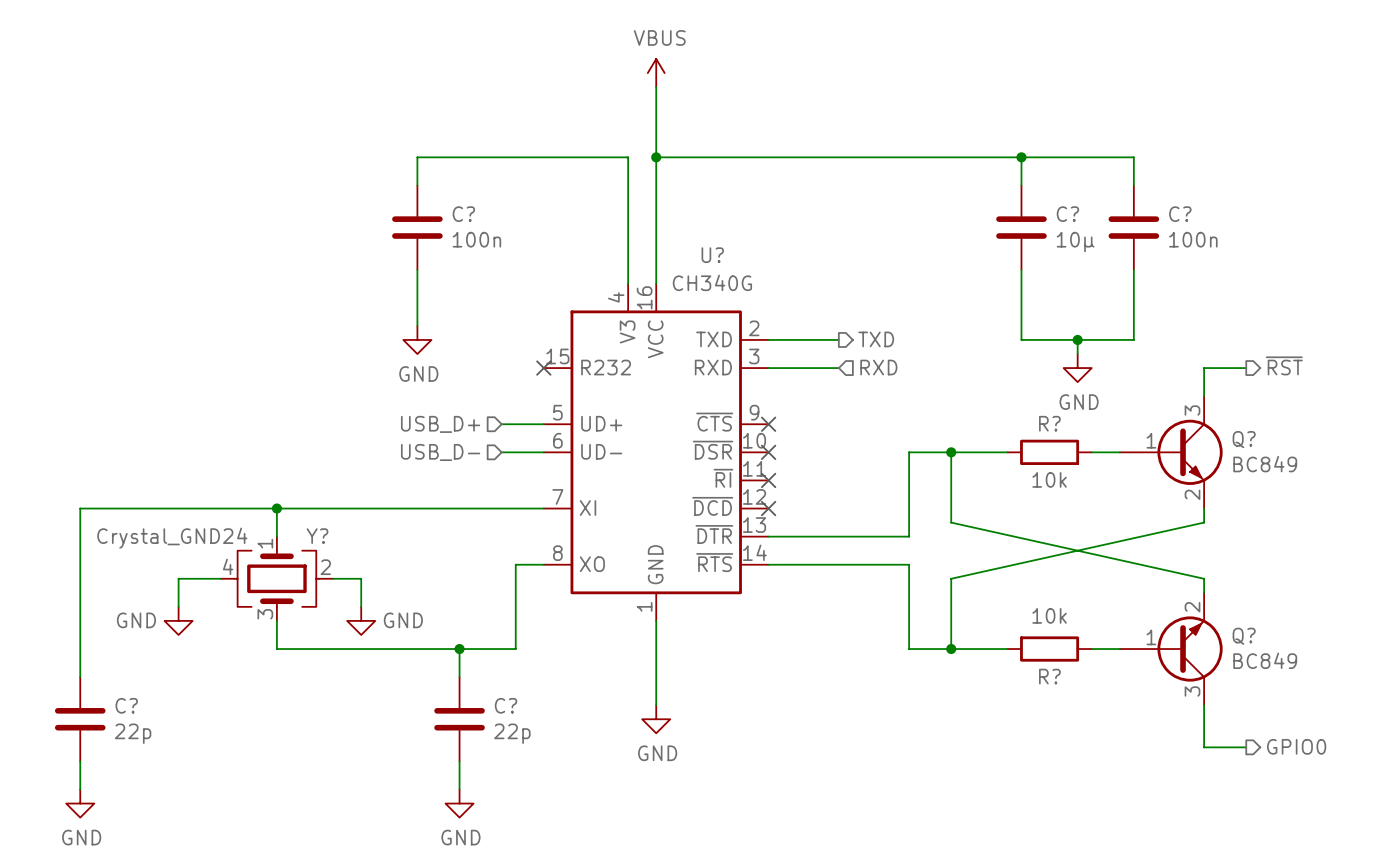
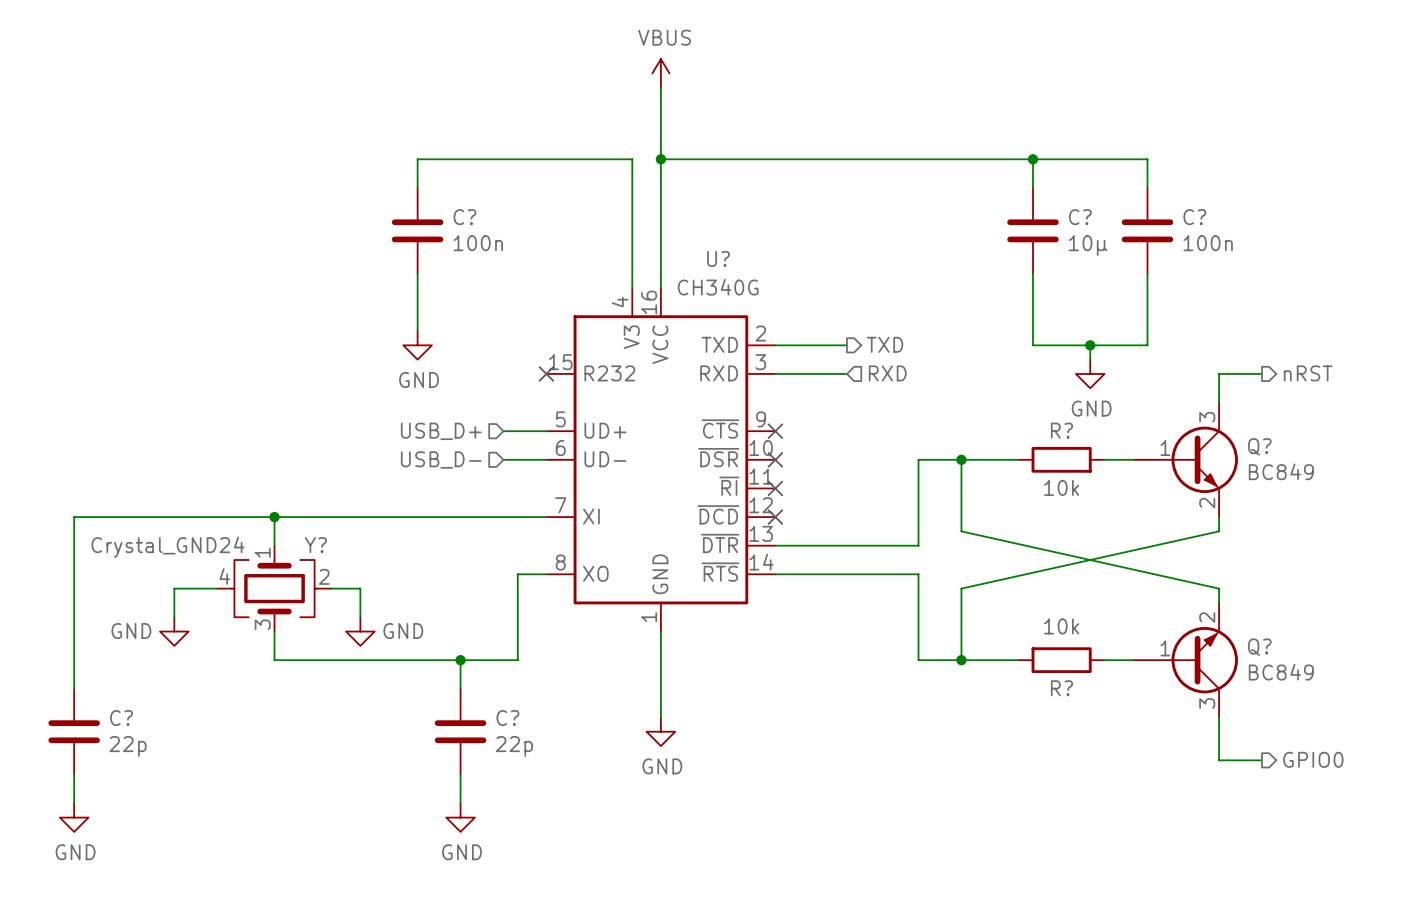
hierarchical label: ~{RST} (1284, 365) -> nRST (1308, 373)

